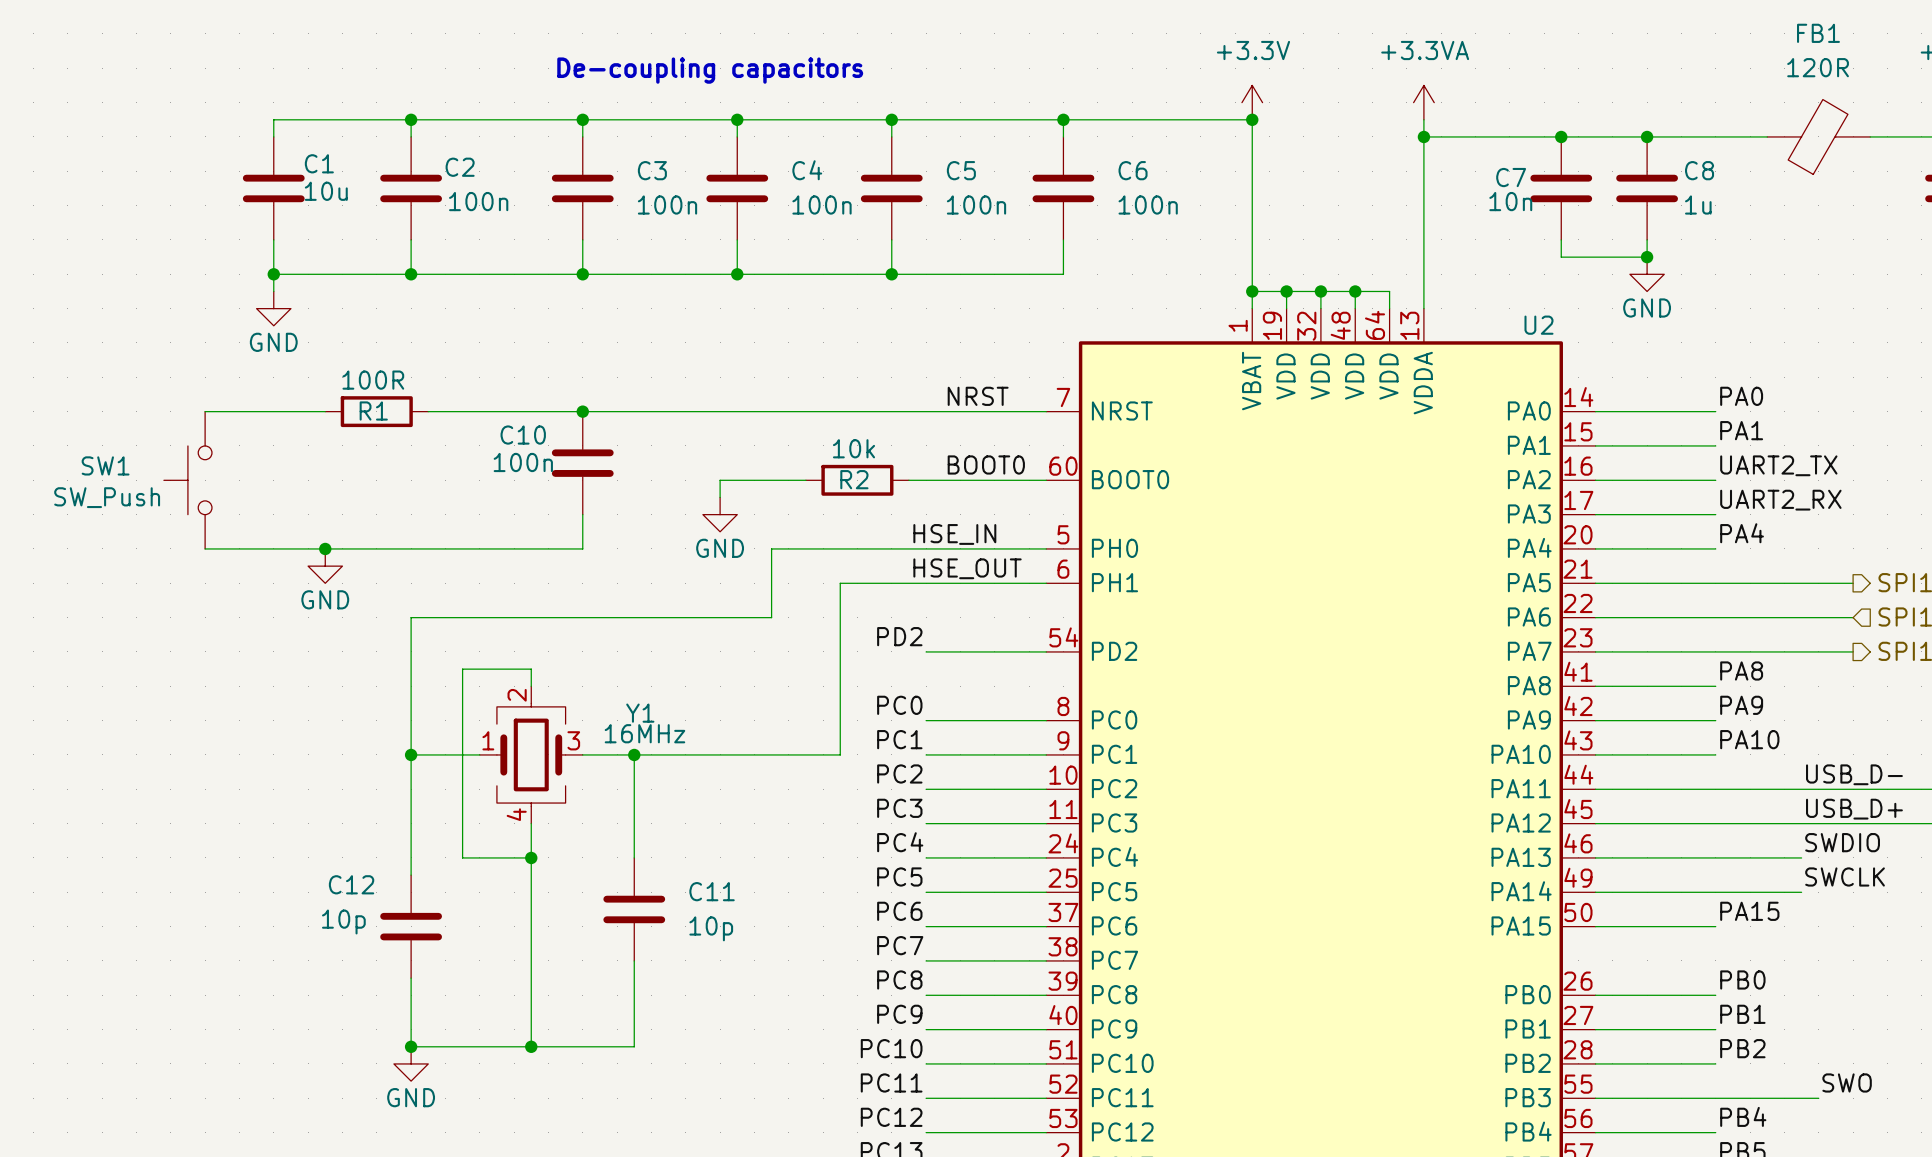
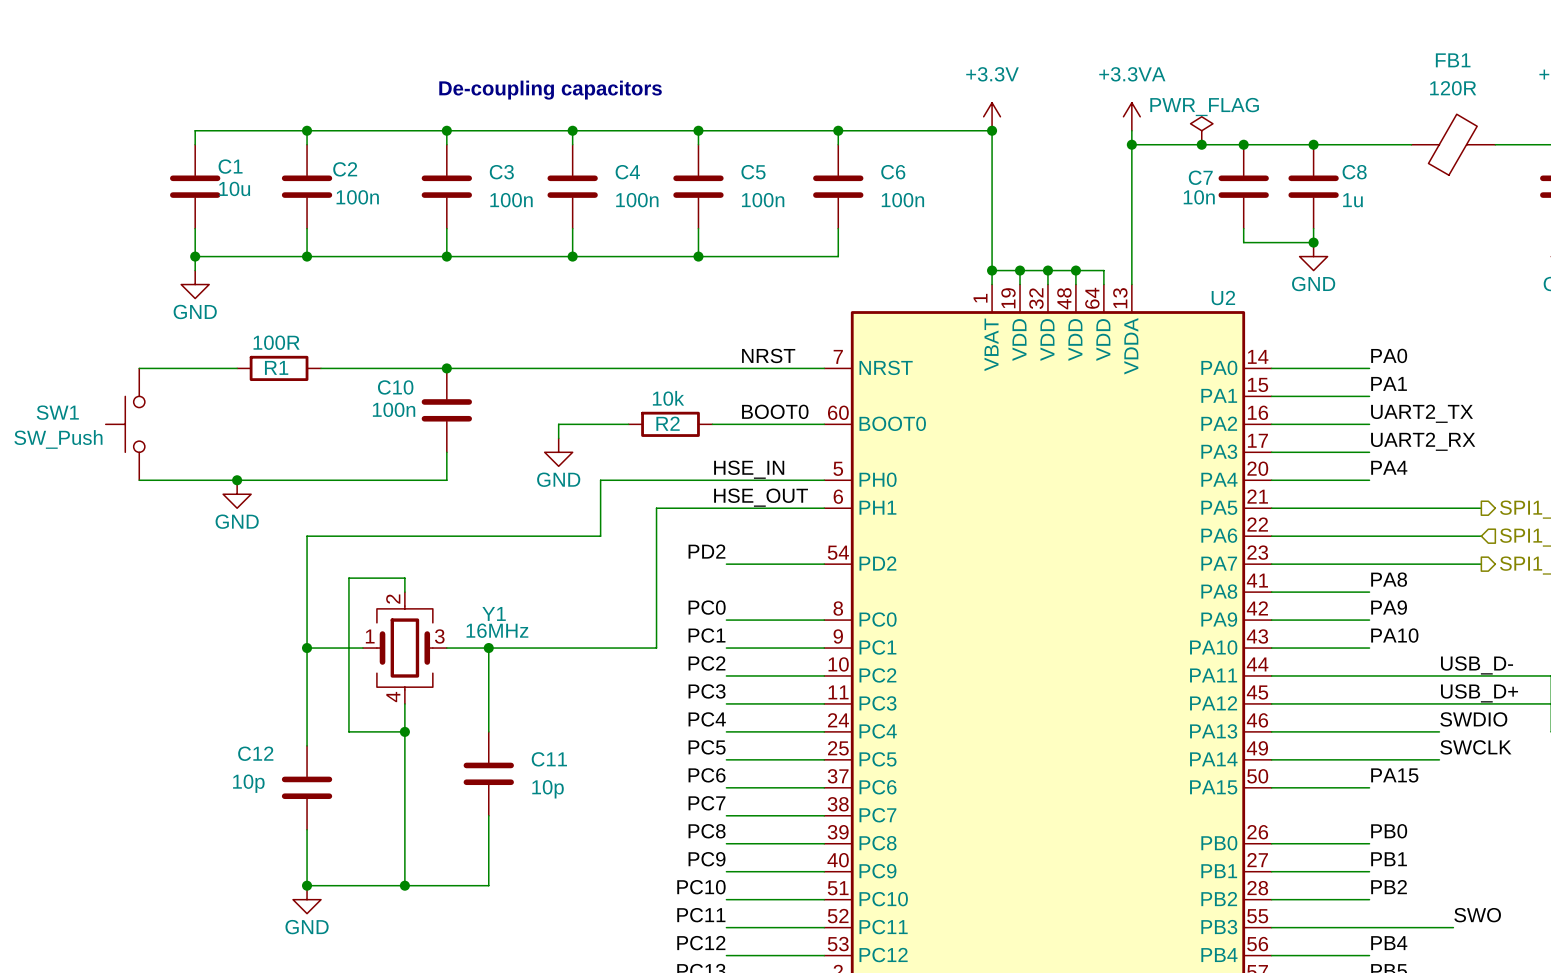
power symbol: none -> PWR_FLAG (1201, 130)
junction: none -> (1201, 144)

